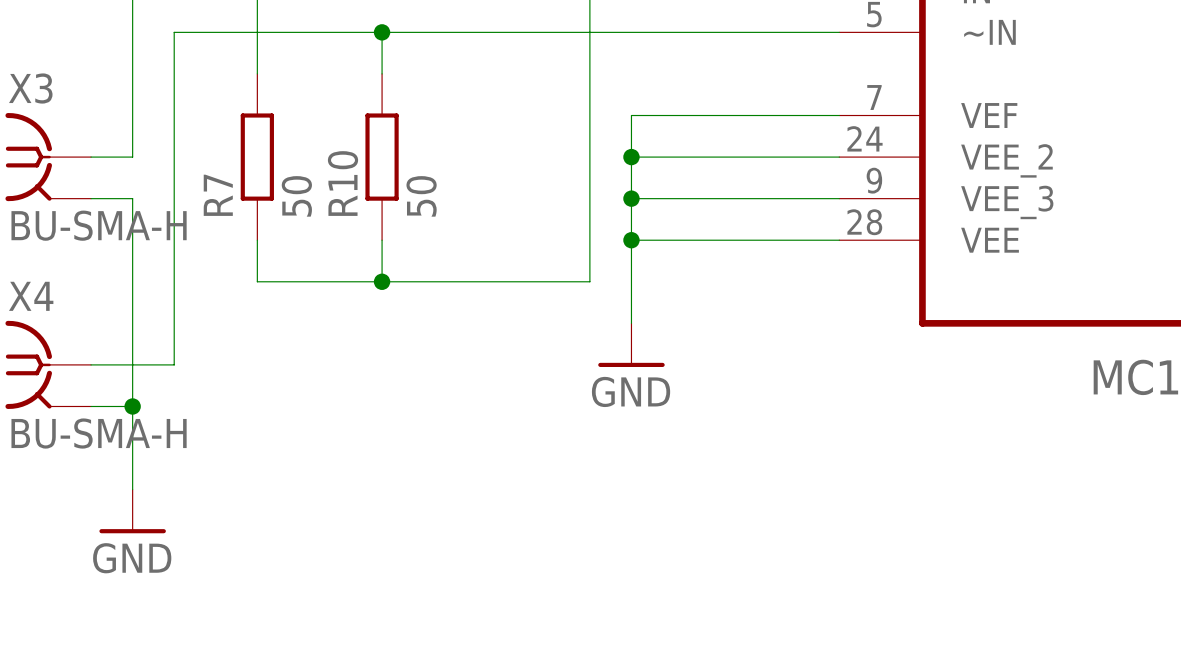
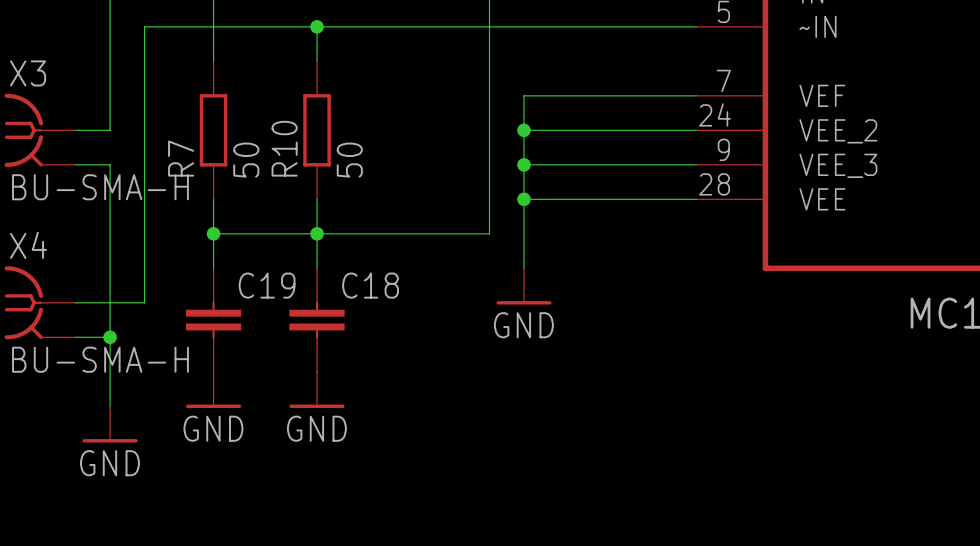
wire: none -> (213, 233) (213, 268)
junction: none -> (213, 233)
wire: none -> (317, 233) (317, 268)
C19: none -> (213, 320)
C18: none -> (317, 320)
power symbol: none -> GND (213, 389)
power symbol: none -> GND (317, 389)

